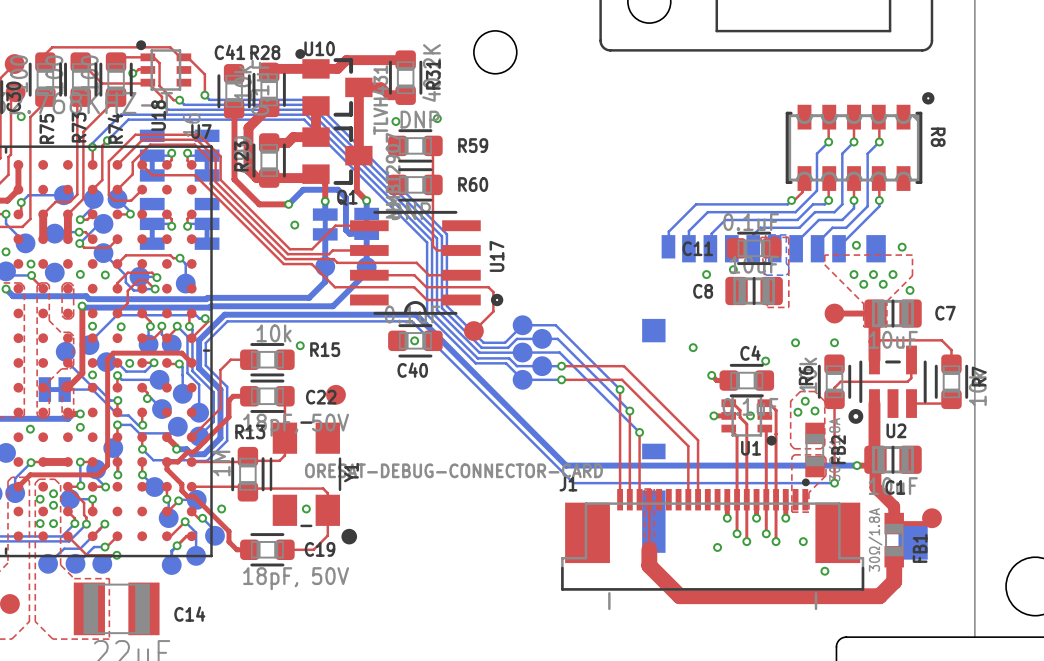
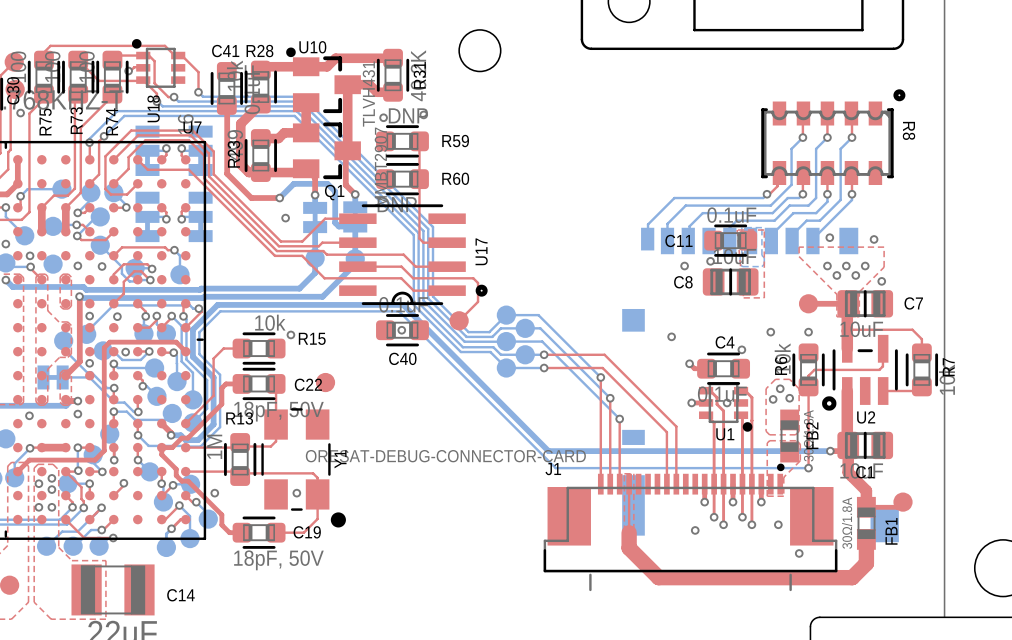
top track: none -> (123, 483) (113, 495)
via: none -> (123, 483)

